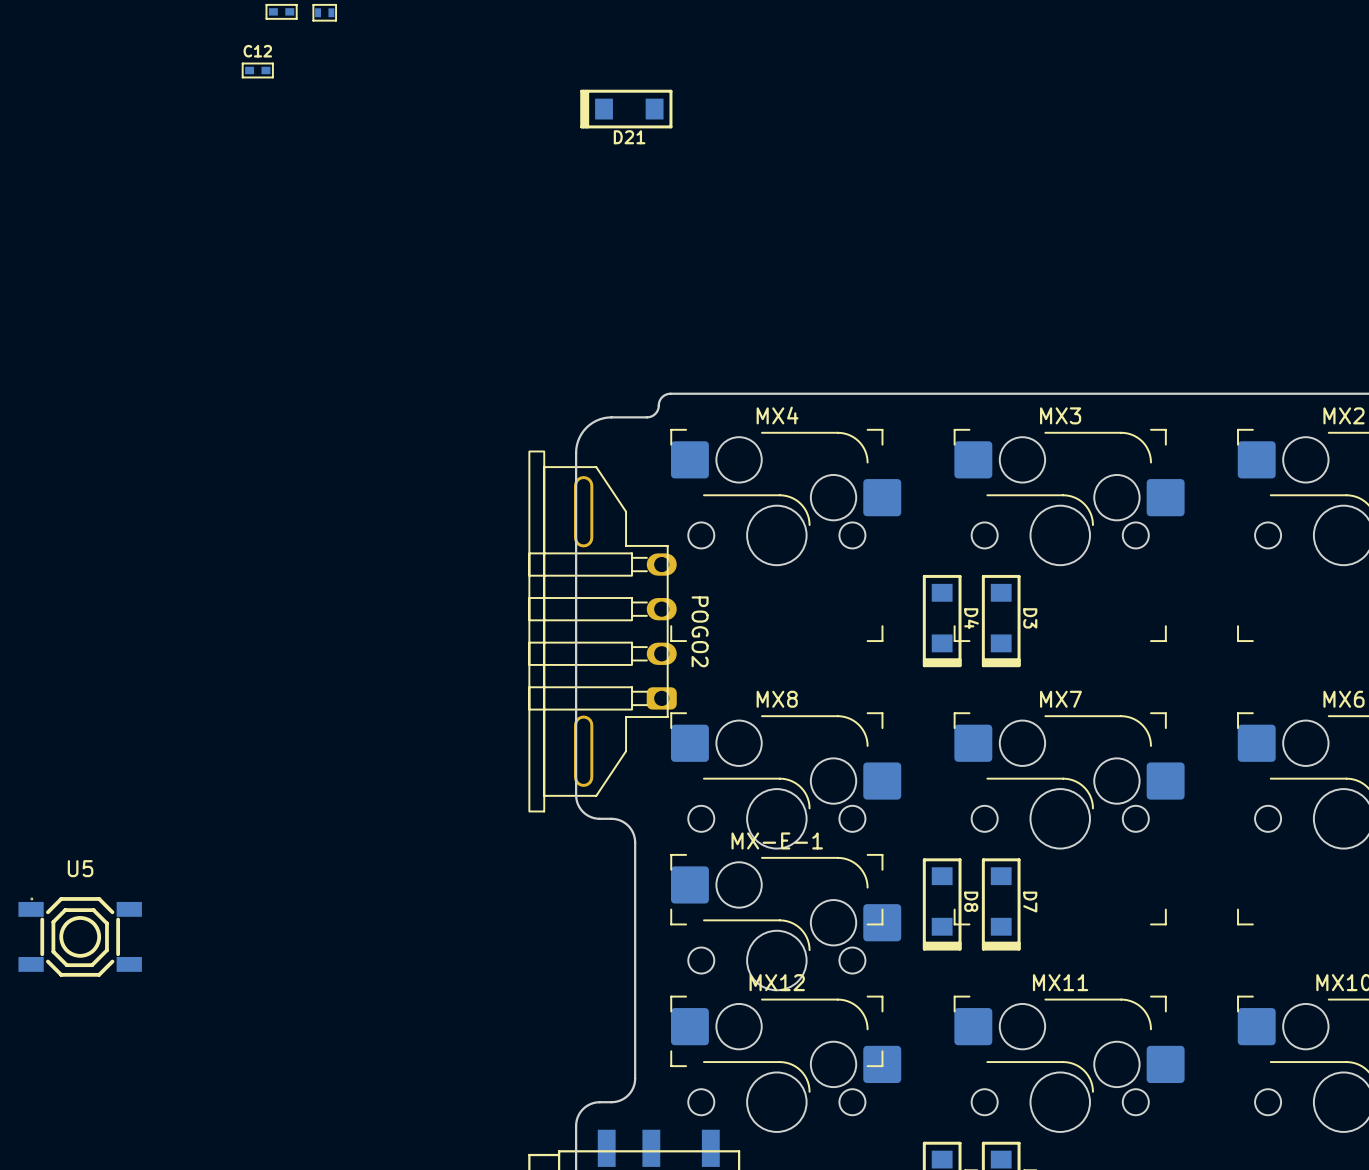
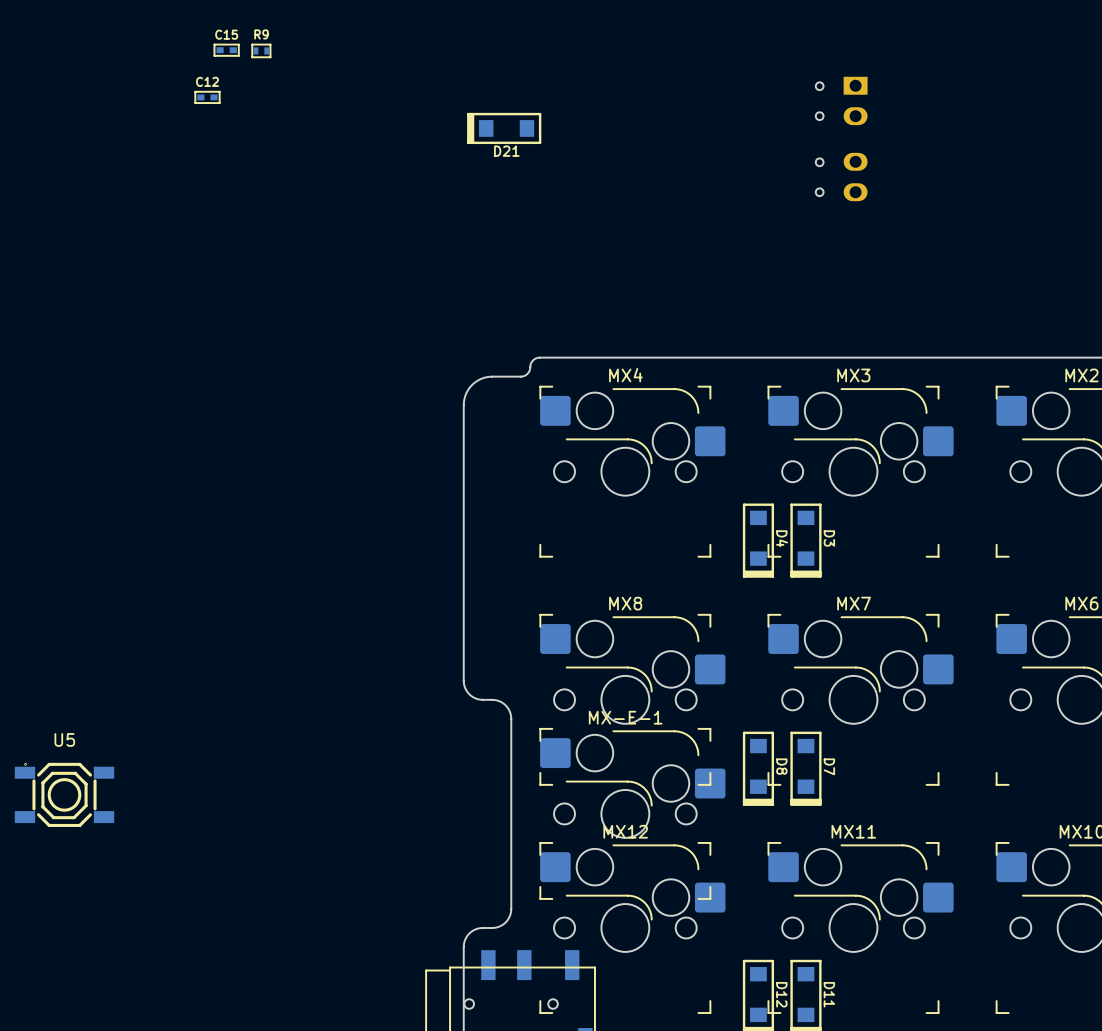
part: none -> (841, 100)
part: none -> (841, 177)
POGO2: (602, 631) -> none

